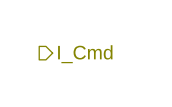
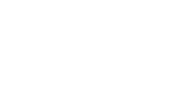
hierarchical label: I_Cmd (85, 54) -> none

